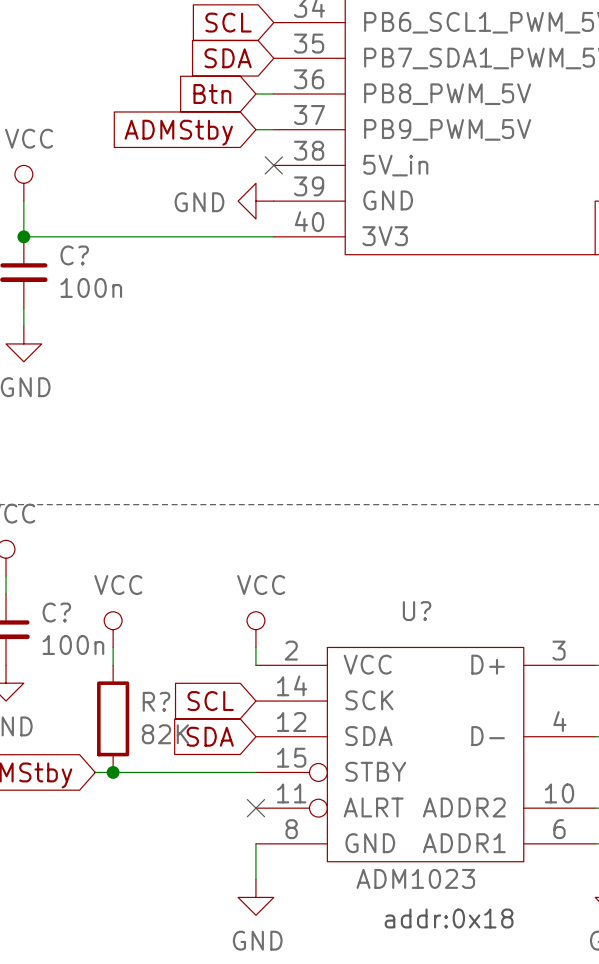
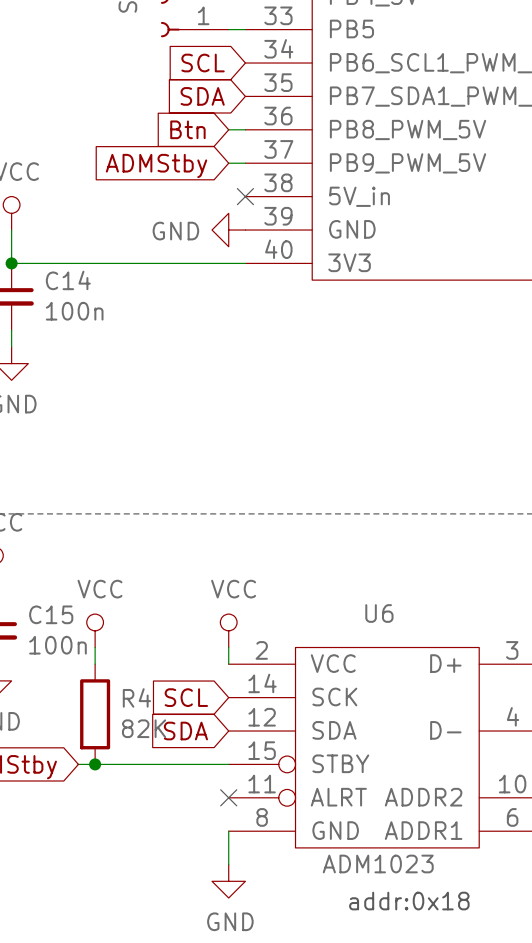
C? name: C? (74, 255) -> C14 (68, 280)
U? name: U? (417, 611) -> U6 (379, 613)
C? name: C? (56, 612) -> C15 (51, 614)
R? name: R? (156, 701) -> R4 (136, 697)

